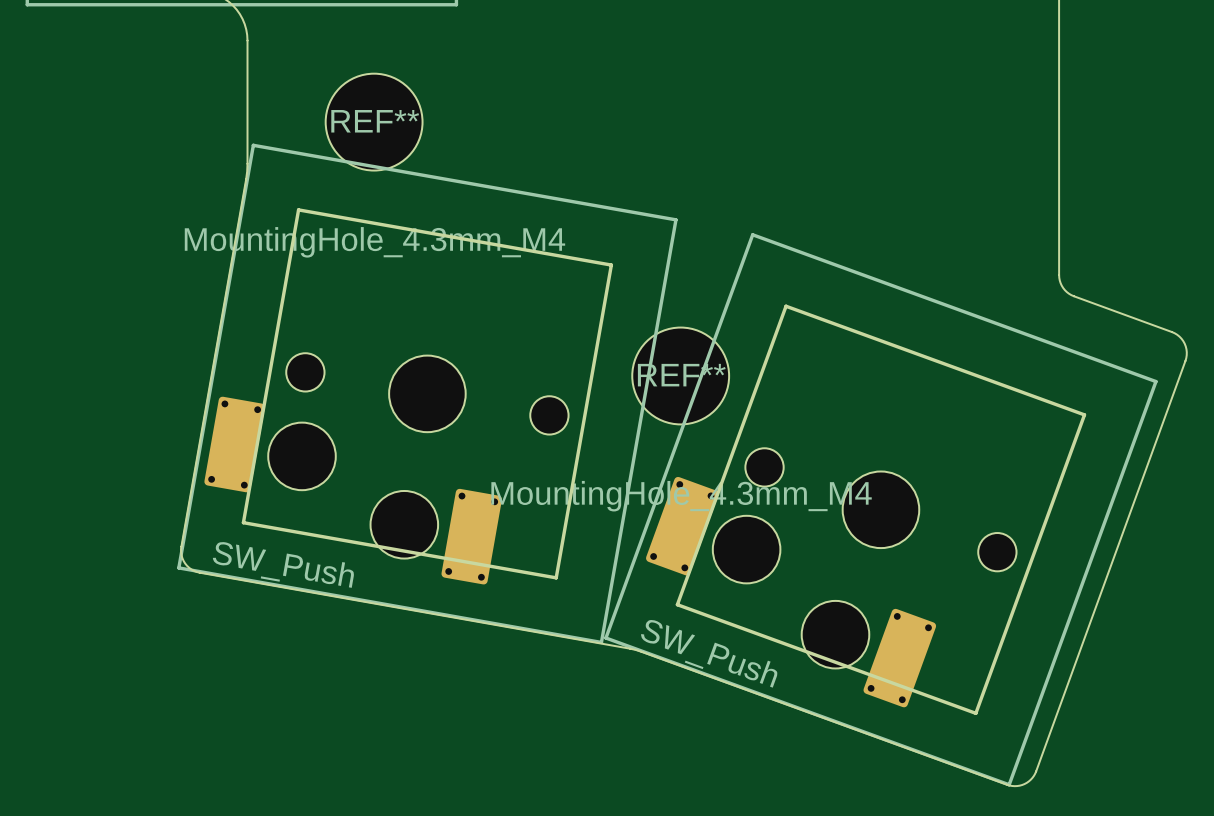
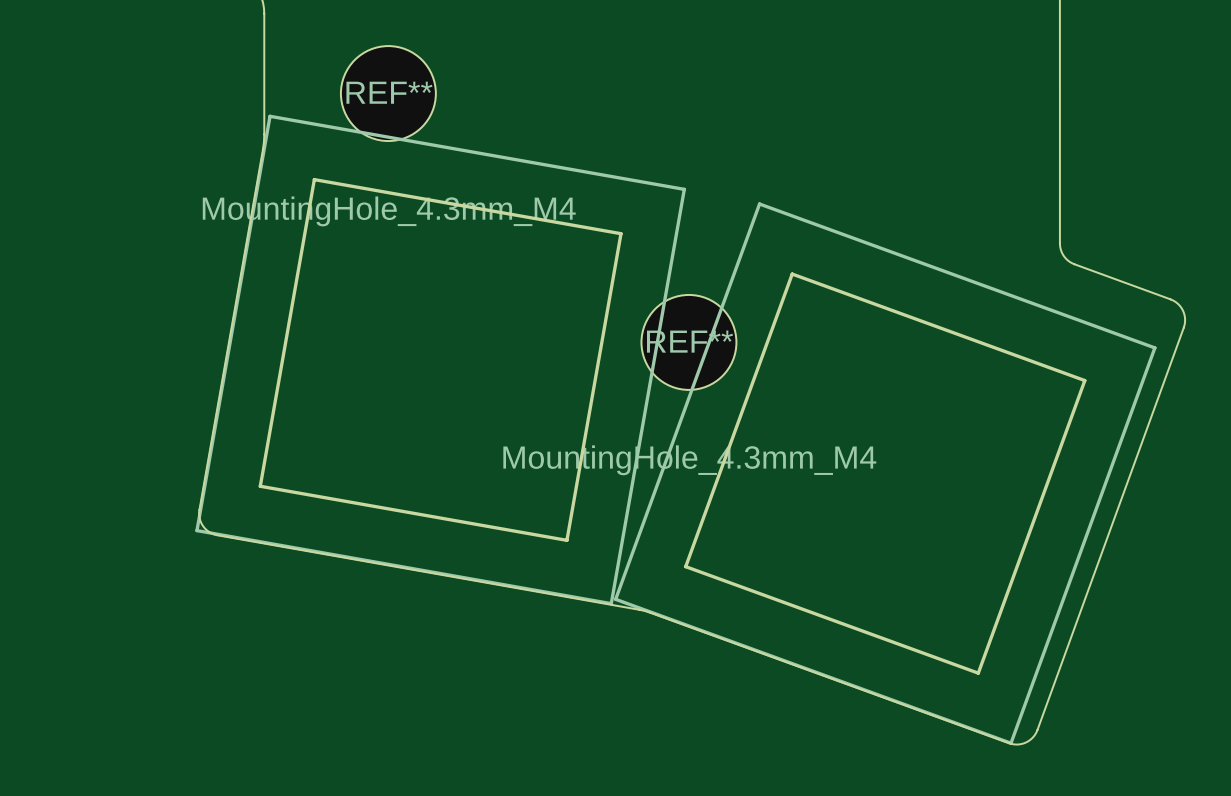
part: SW_Push (386, 468) -> none
part: SW_Push (831, 577) -> none

